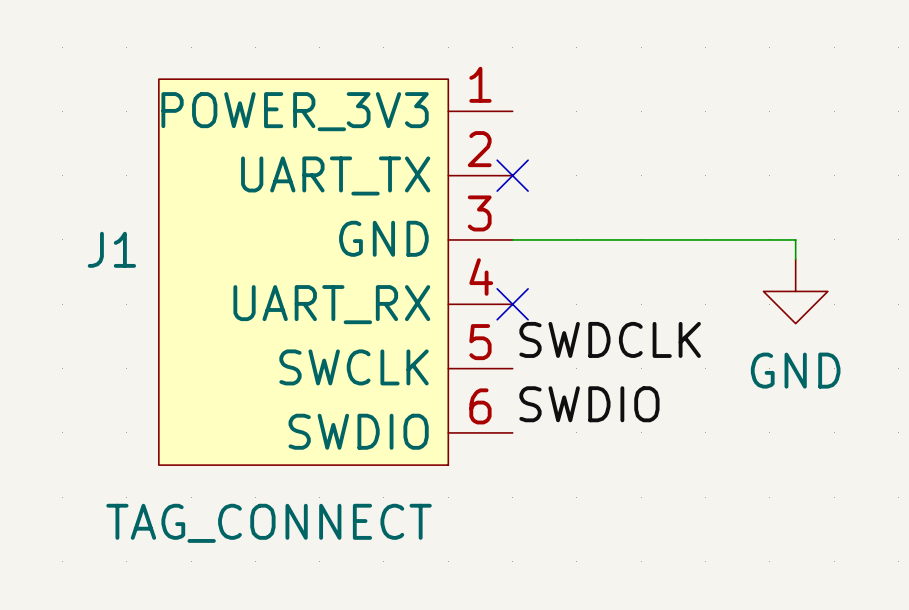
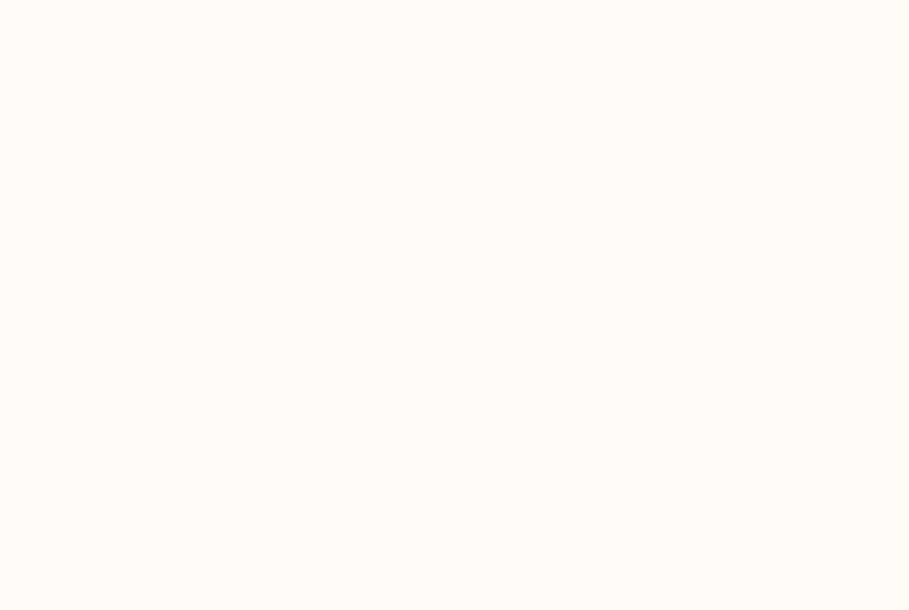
no-connect mark: (512, 175) -> none
wire: (512, 239) (795, 239) (795, 259) -> none
J1: TAG_CONNECT (335, 272) -> none
power symbol: GND (795, 291) -> none
no-connect mark: (512, 304) -> none
label: SWDCLK (610, 339) -> none
label: SWDIO (589, 404) -> none

